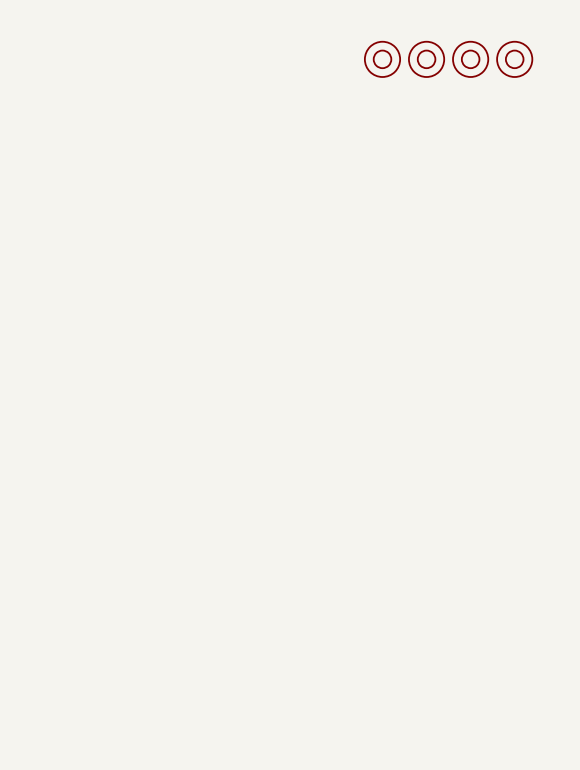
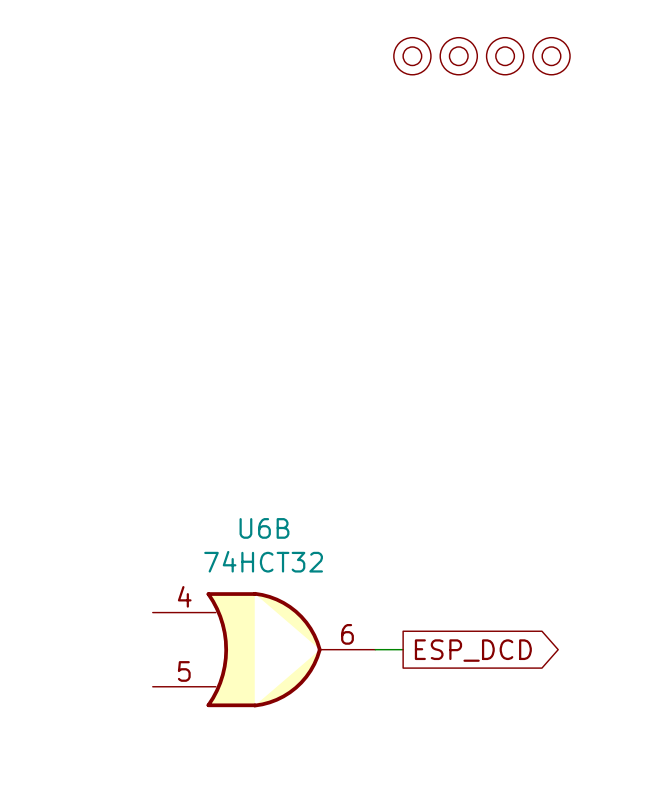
U6B: none -> 74HCT32 (264, 649)
wire: none -> (375, 649) (403, 649)
global label: none -> ESP_DCD (473, 650)

